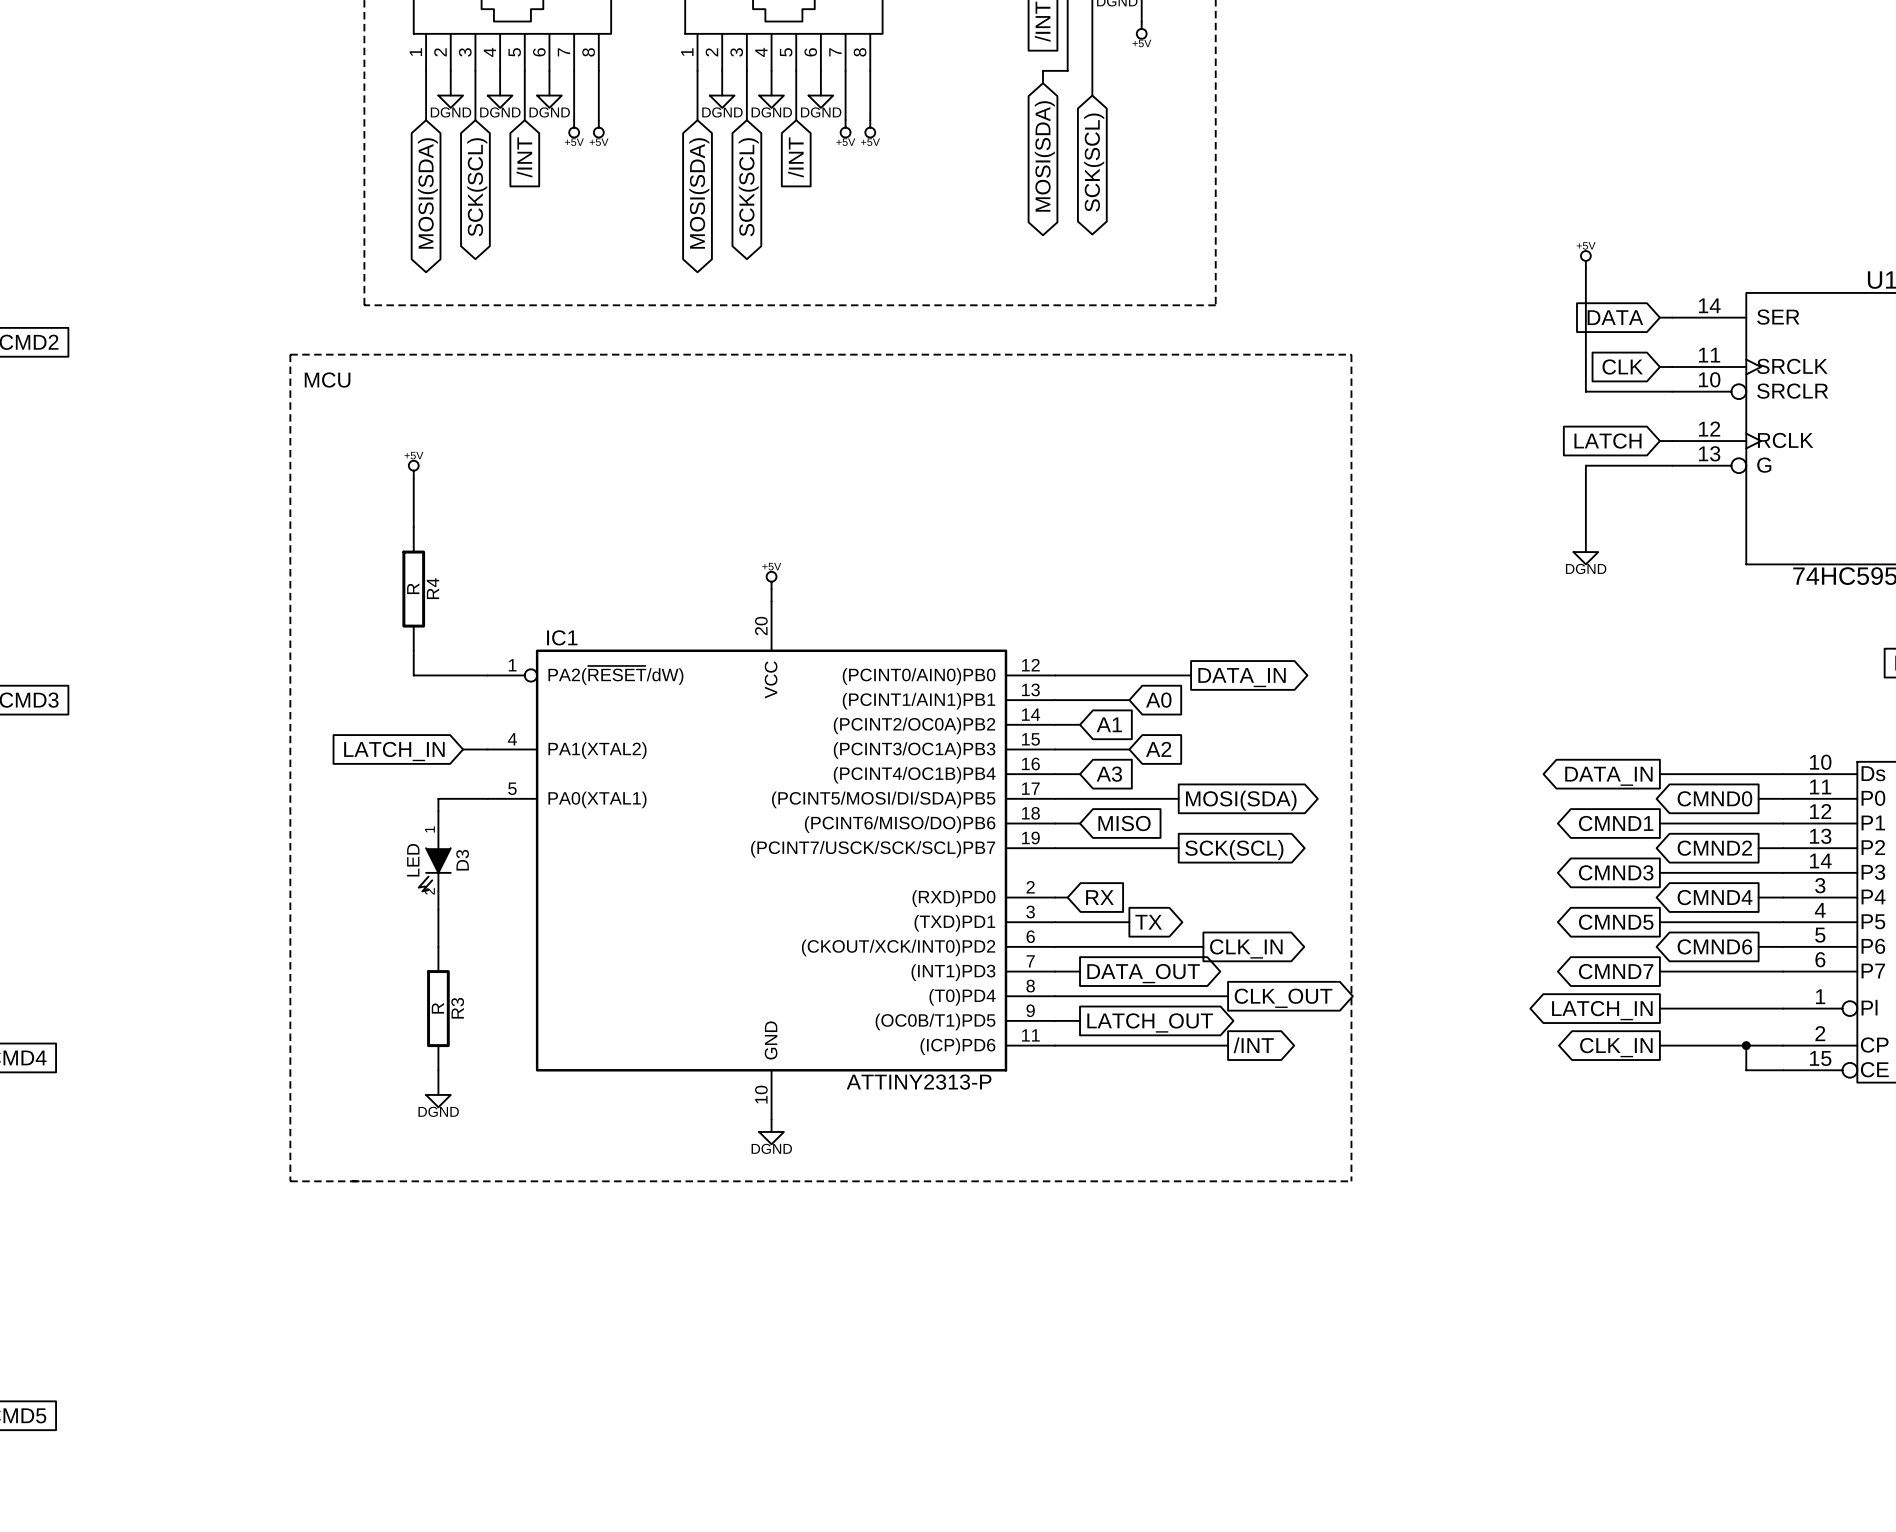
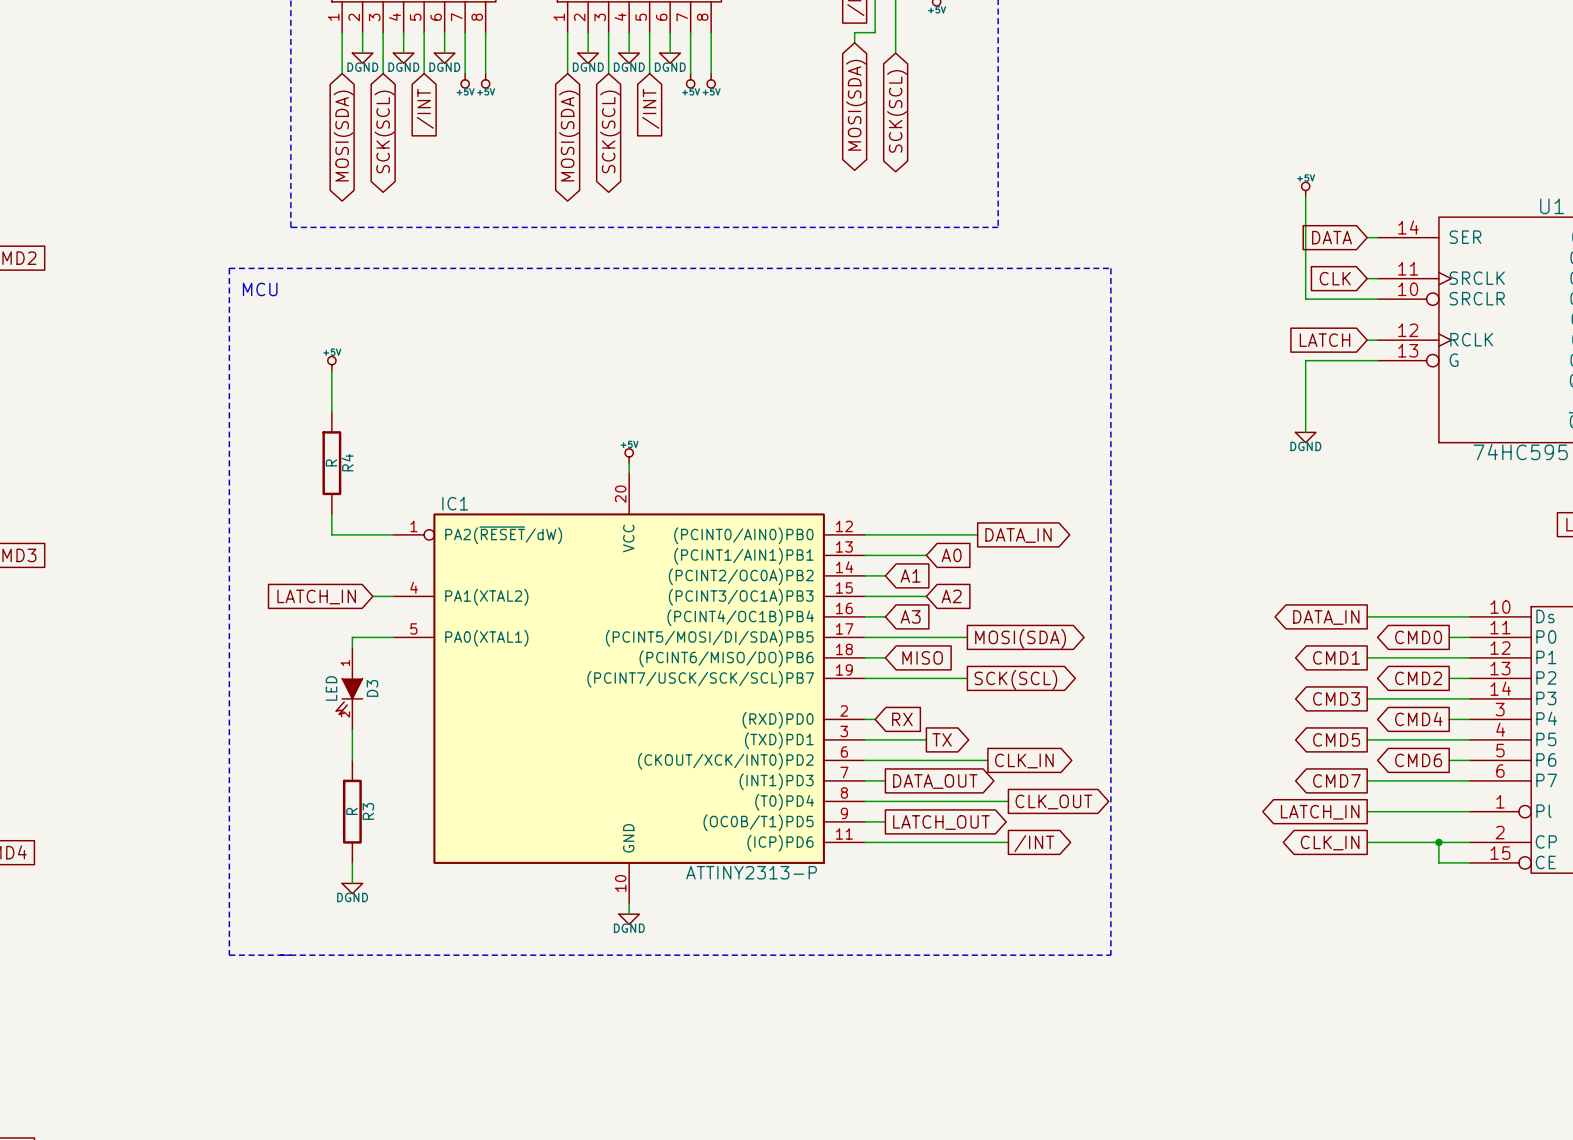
global label: CMND0 (1714, 798) -> CMD0 (1418, 637)
global label: CMND1 (1616, 823) -> CMD1 (1336, 657)
global label: CMND2 (1714, 848) -> CMD2 (1418, 678)
global label: CMND3 (1616, 872) -> CMD3 (1336, 698)
global label: CMND4 (1715, 897) -> CMD4 (1418, 719)
global label: CMND5 (1616, 922) -> CMD5 (1336, 739)
global label: CMND6 (1714, 946) -> CMD6 (1418, 760)
global label: CMND7 (1616, 971) -> CMD7 (1336, 780)

